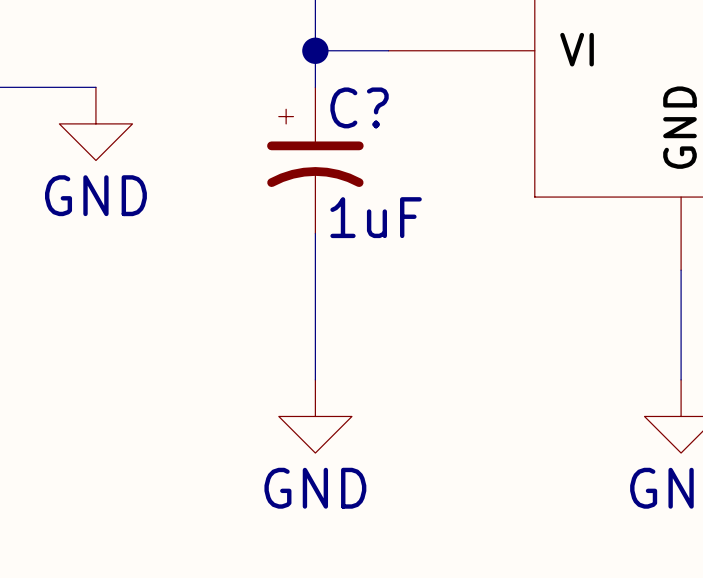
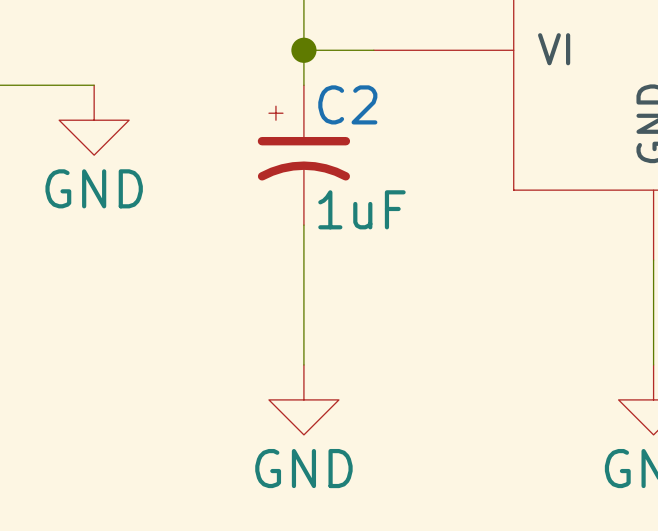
C? name: C? (359, 107) -> C2 (347, 104)

